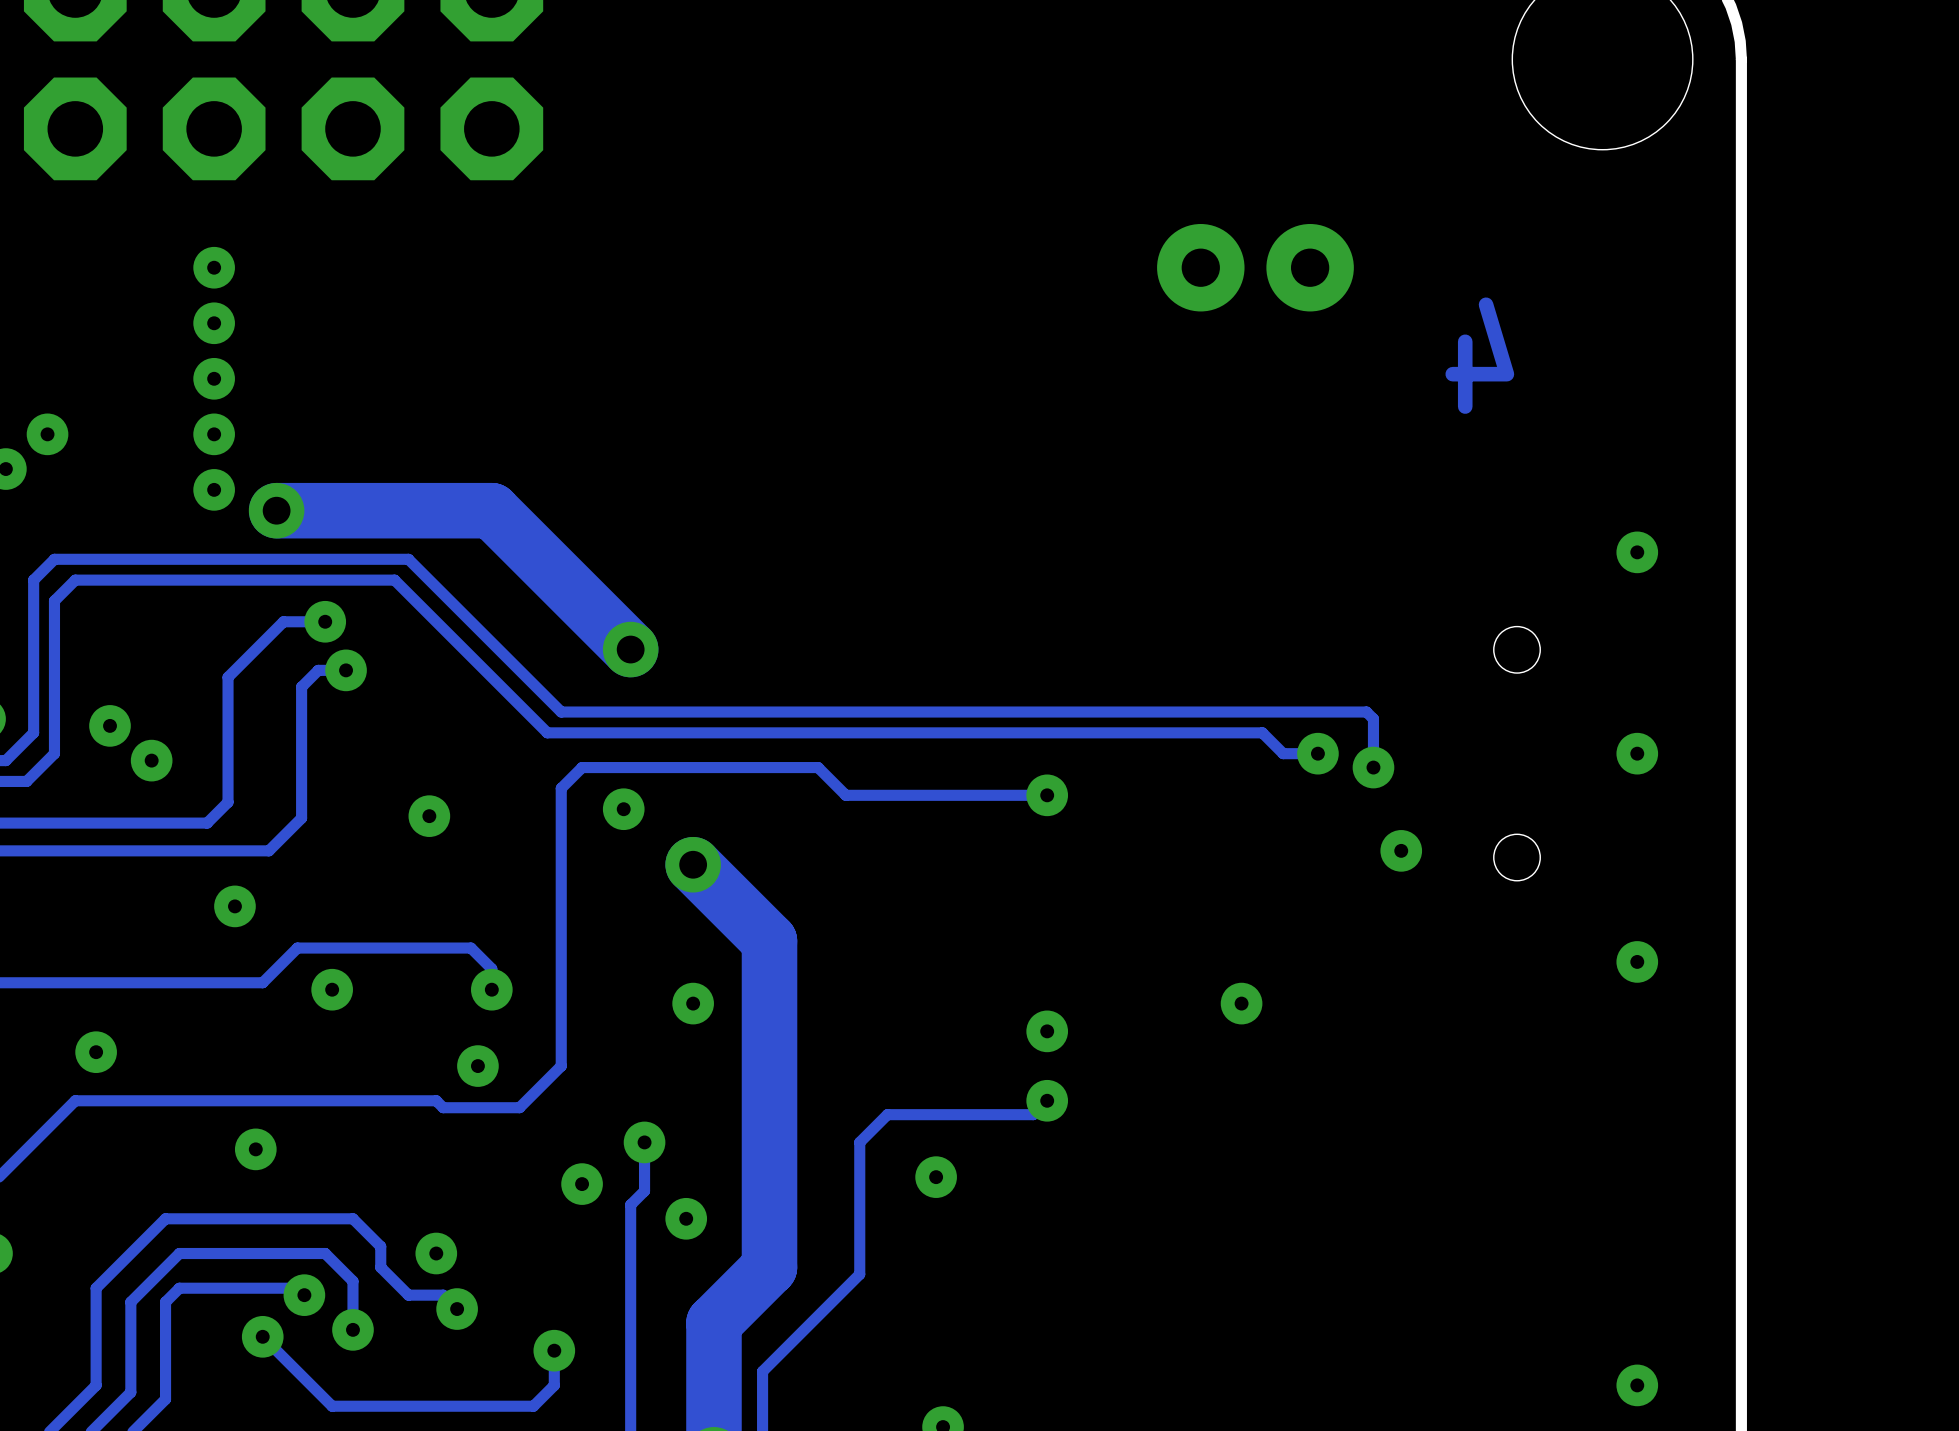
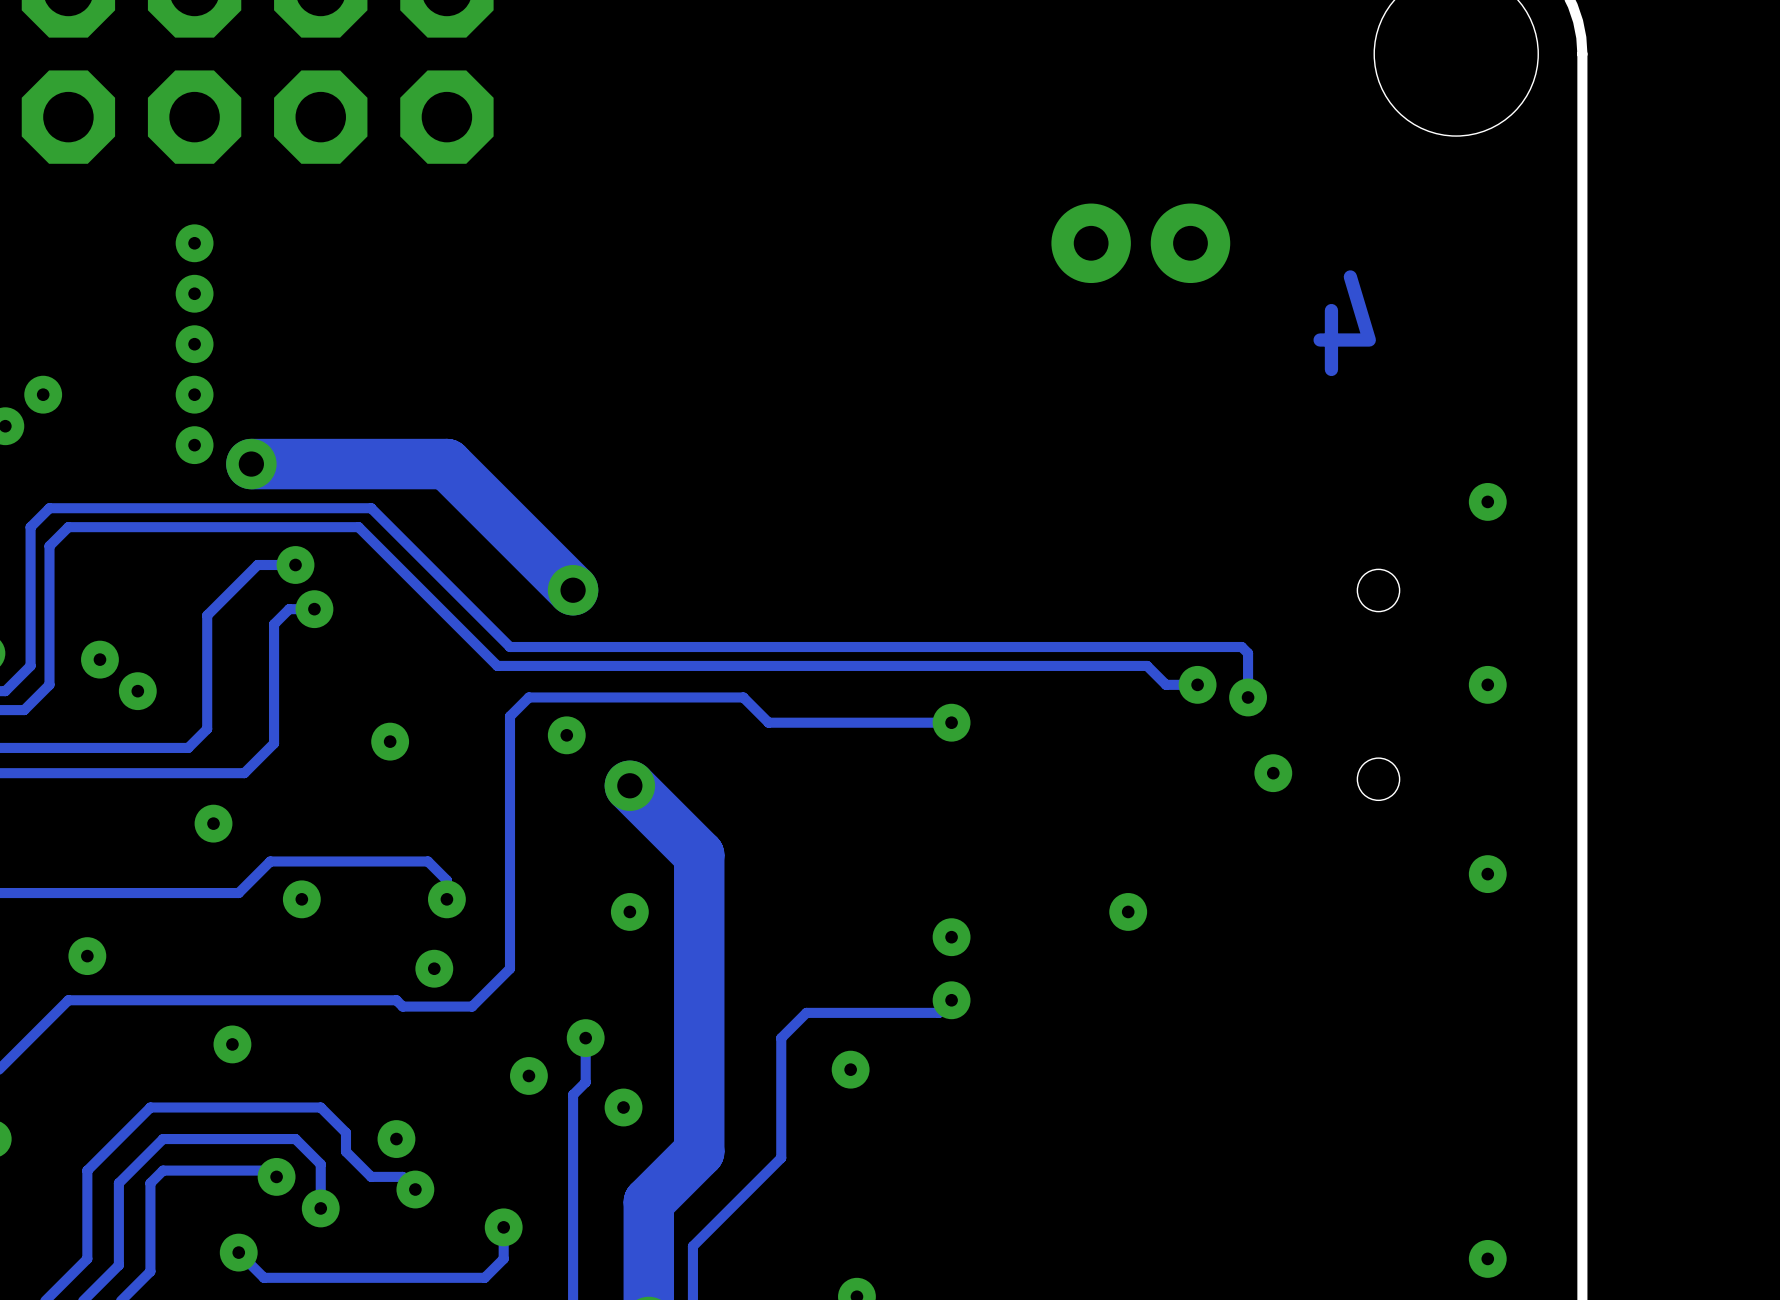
track: (262, 1336) (332, 1406) -> (238, 1252) (263, 1277) (301, 1277)
via position: (262, 1336) -> (238, 1252)

